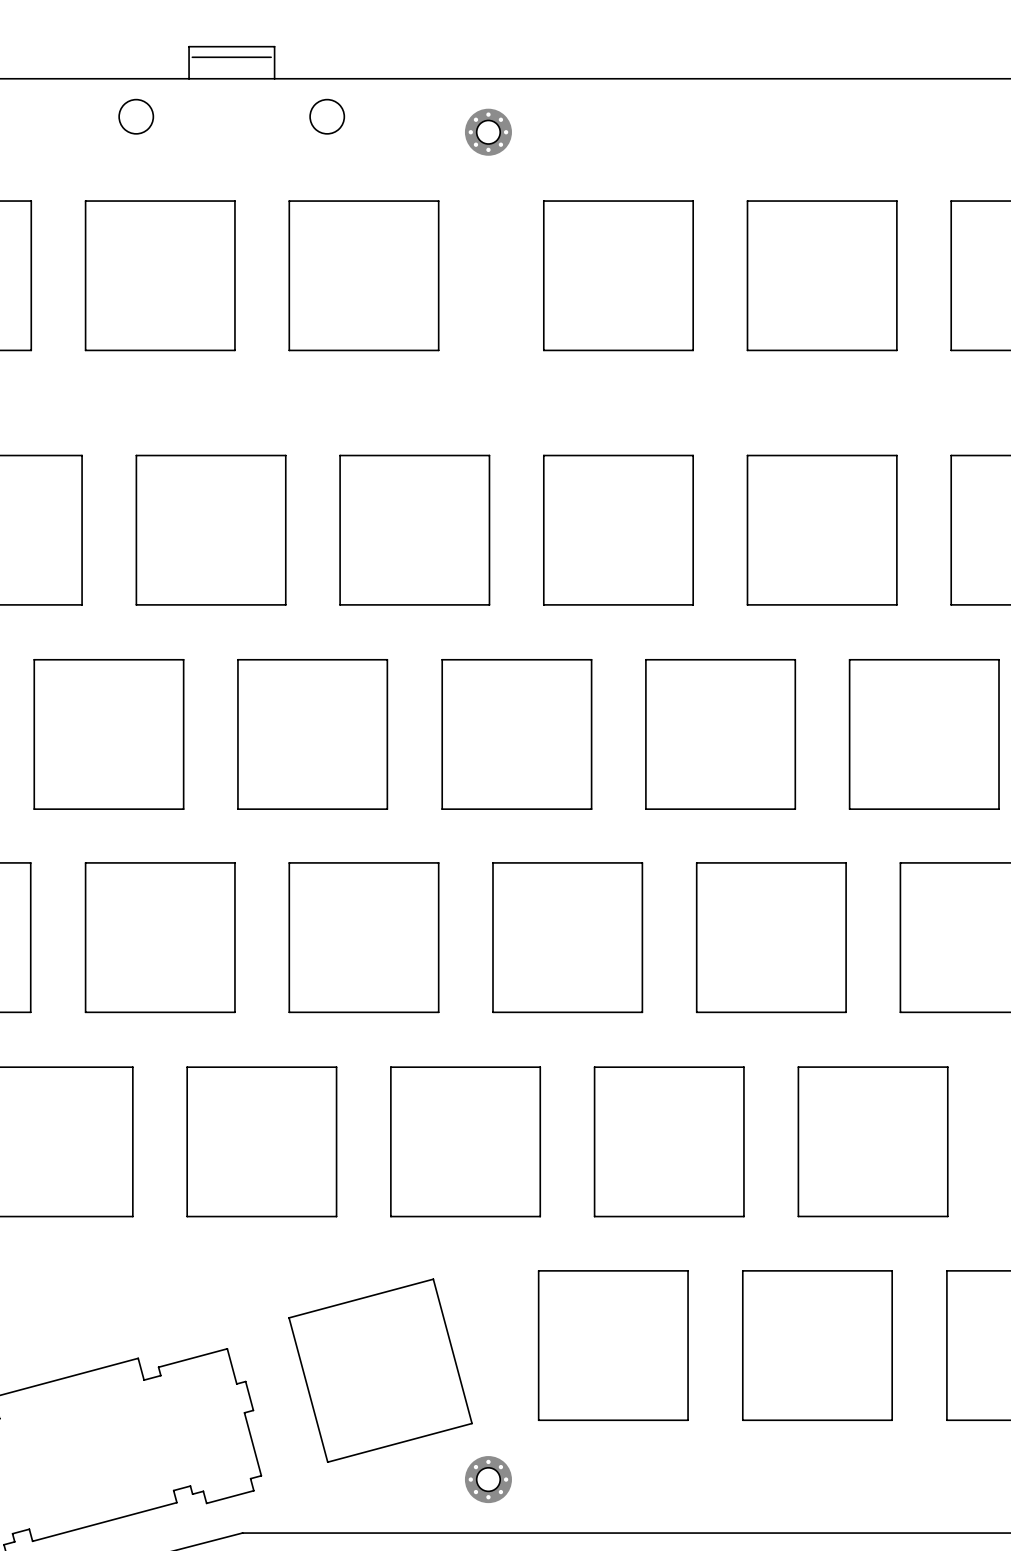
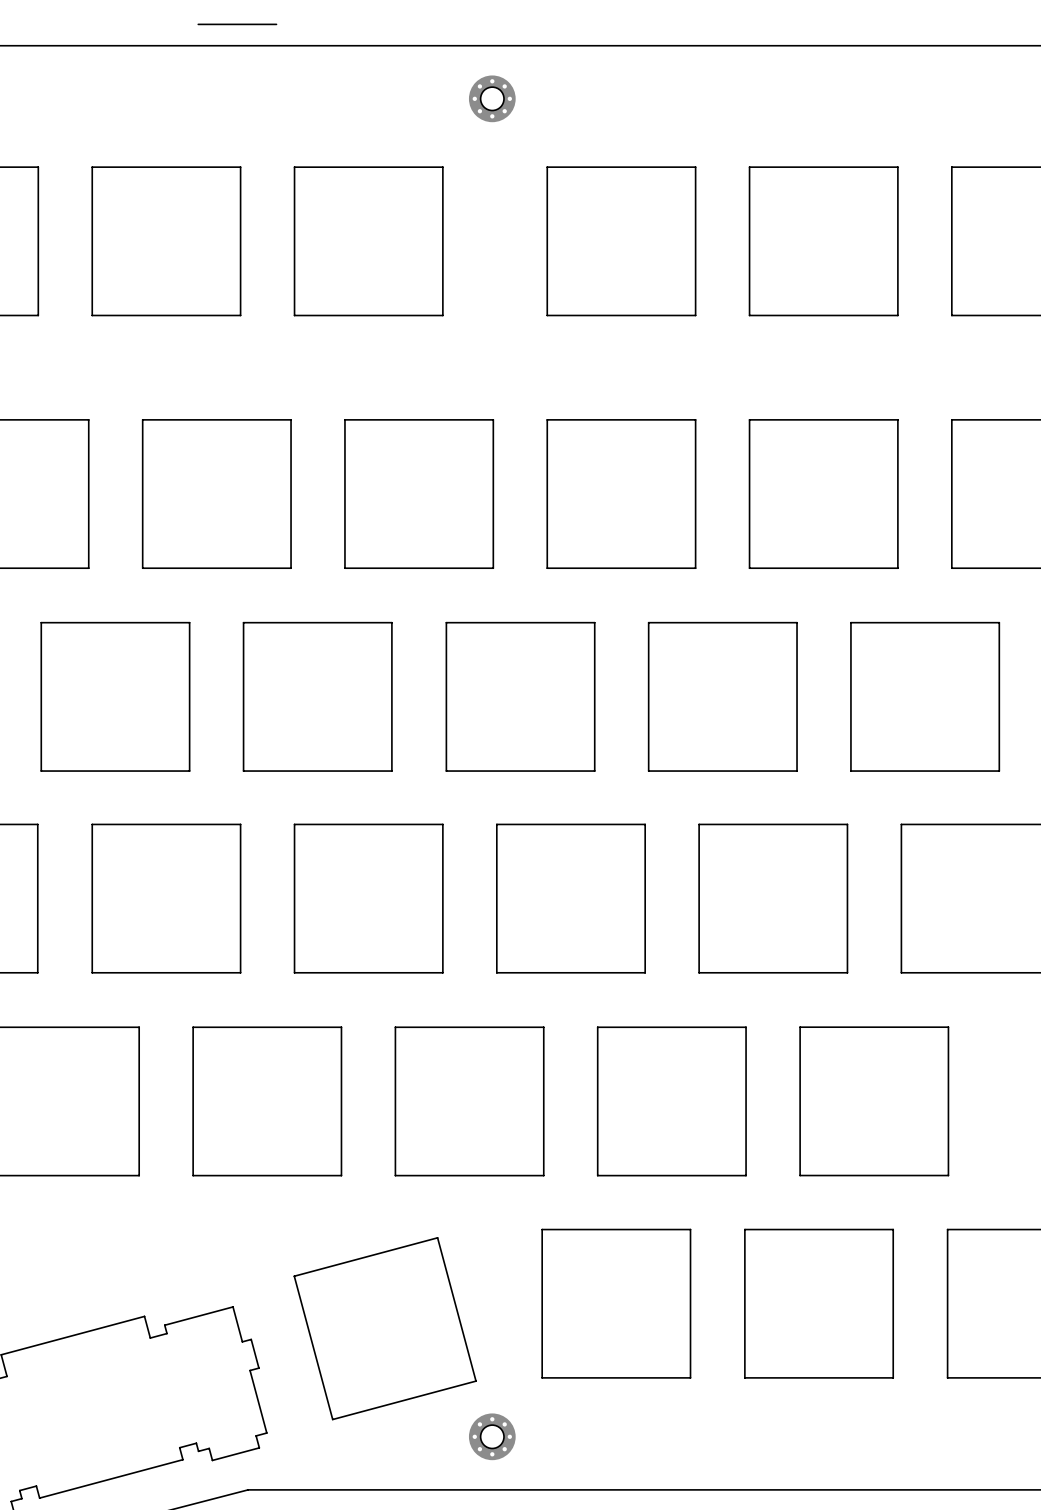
board edge: (189, 78) (189, 46) (274, 46) (274, 78) -> none
round board edge: [118, 99, 154, 135] -> none
round board edge: [309, 99, 345, 135] -> none

